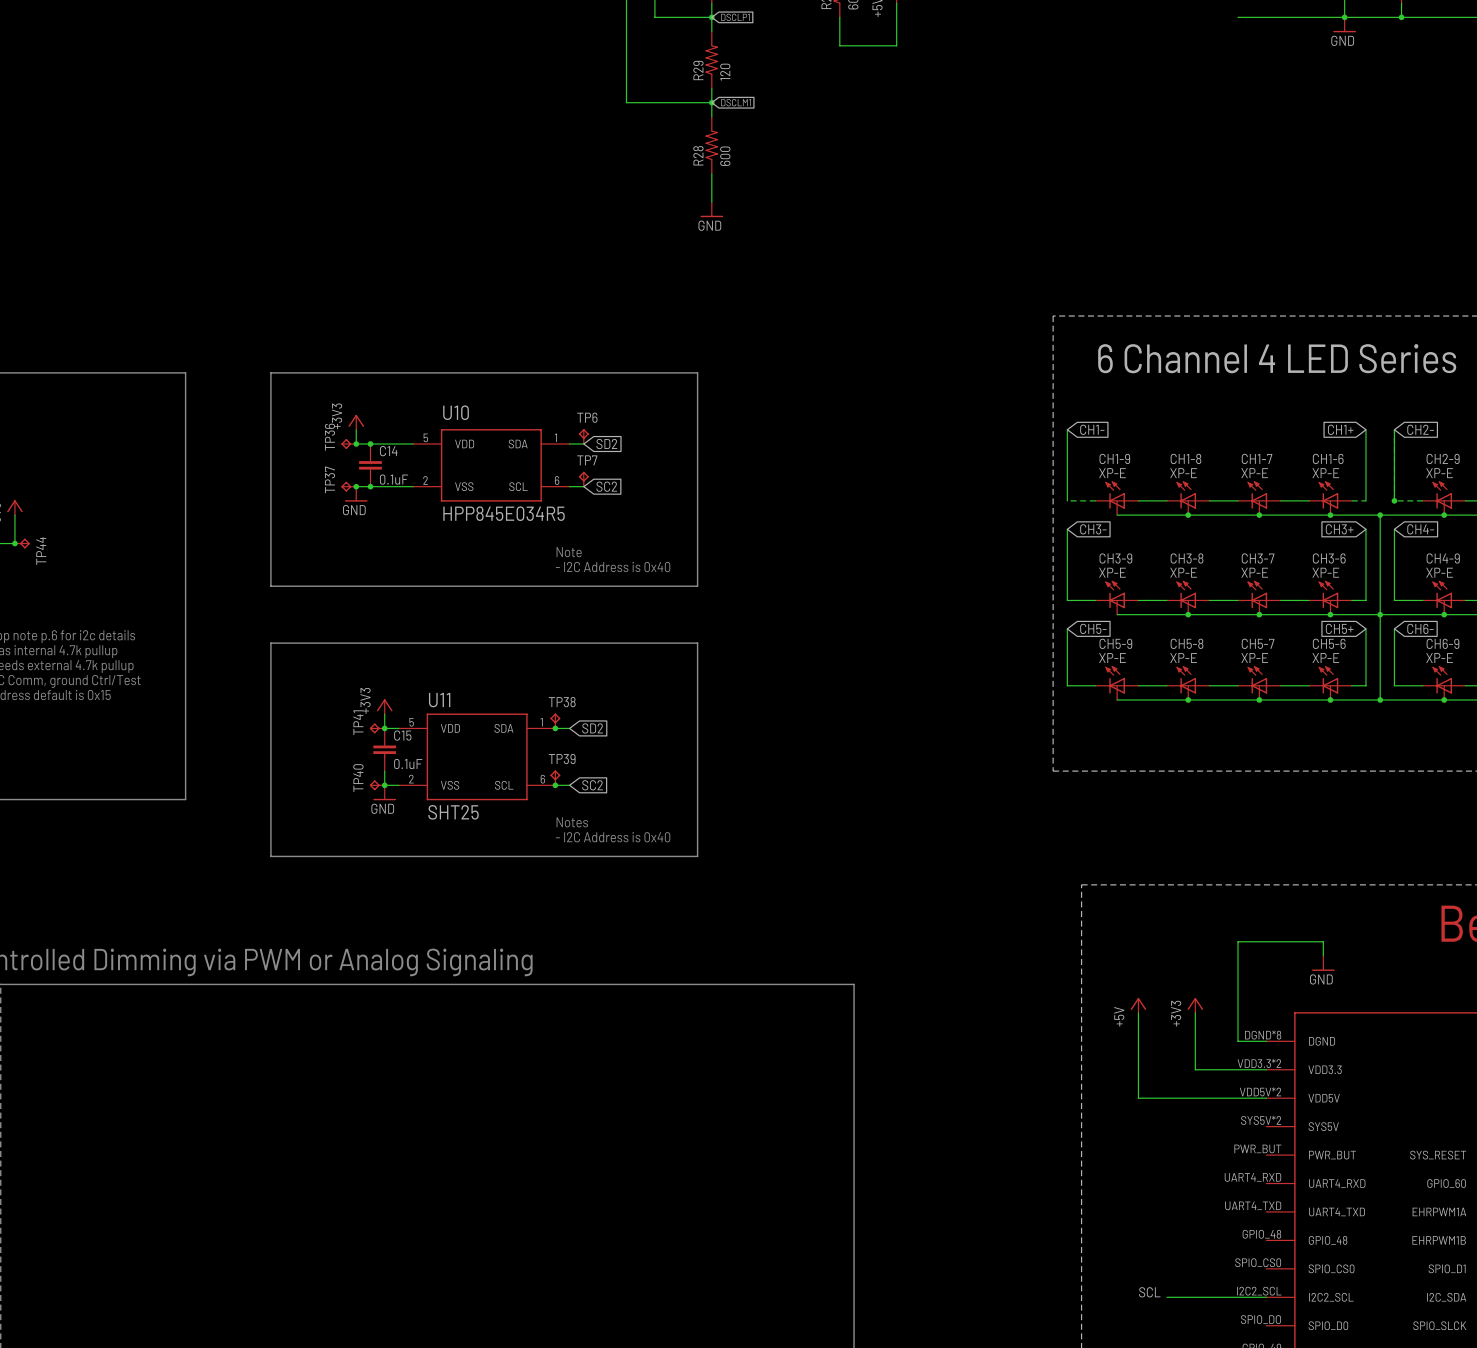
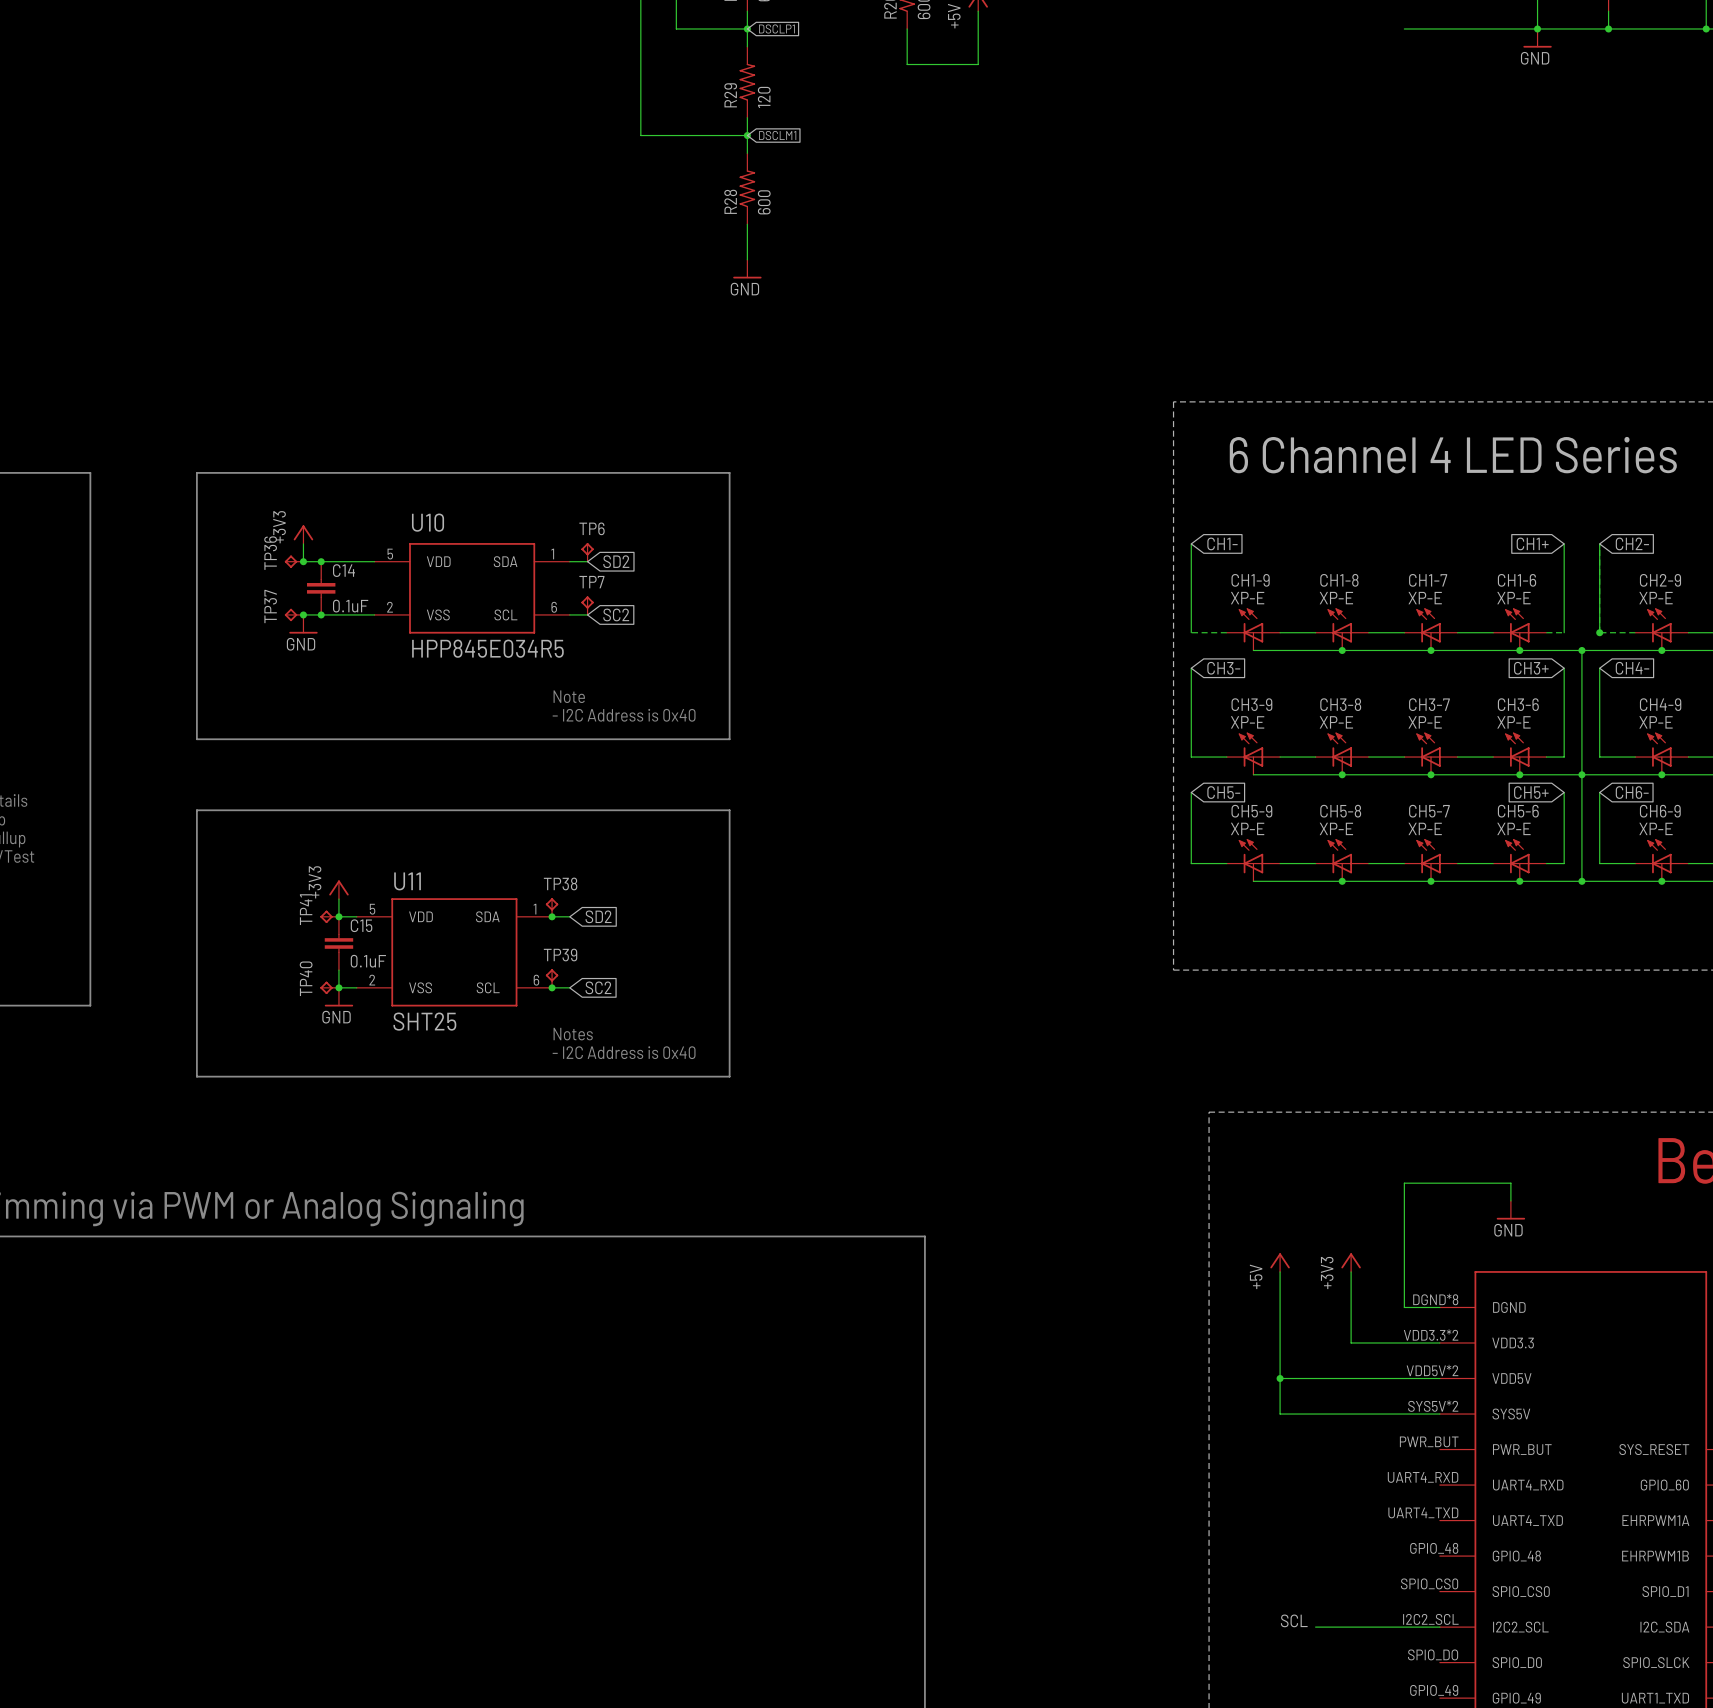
wire: none -> (1280, 1378) (1280, 1414) (1439, 1414)
junction: none -> (1280, 1378)

